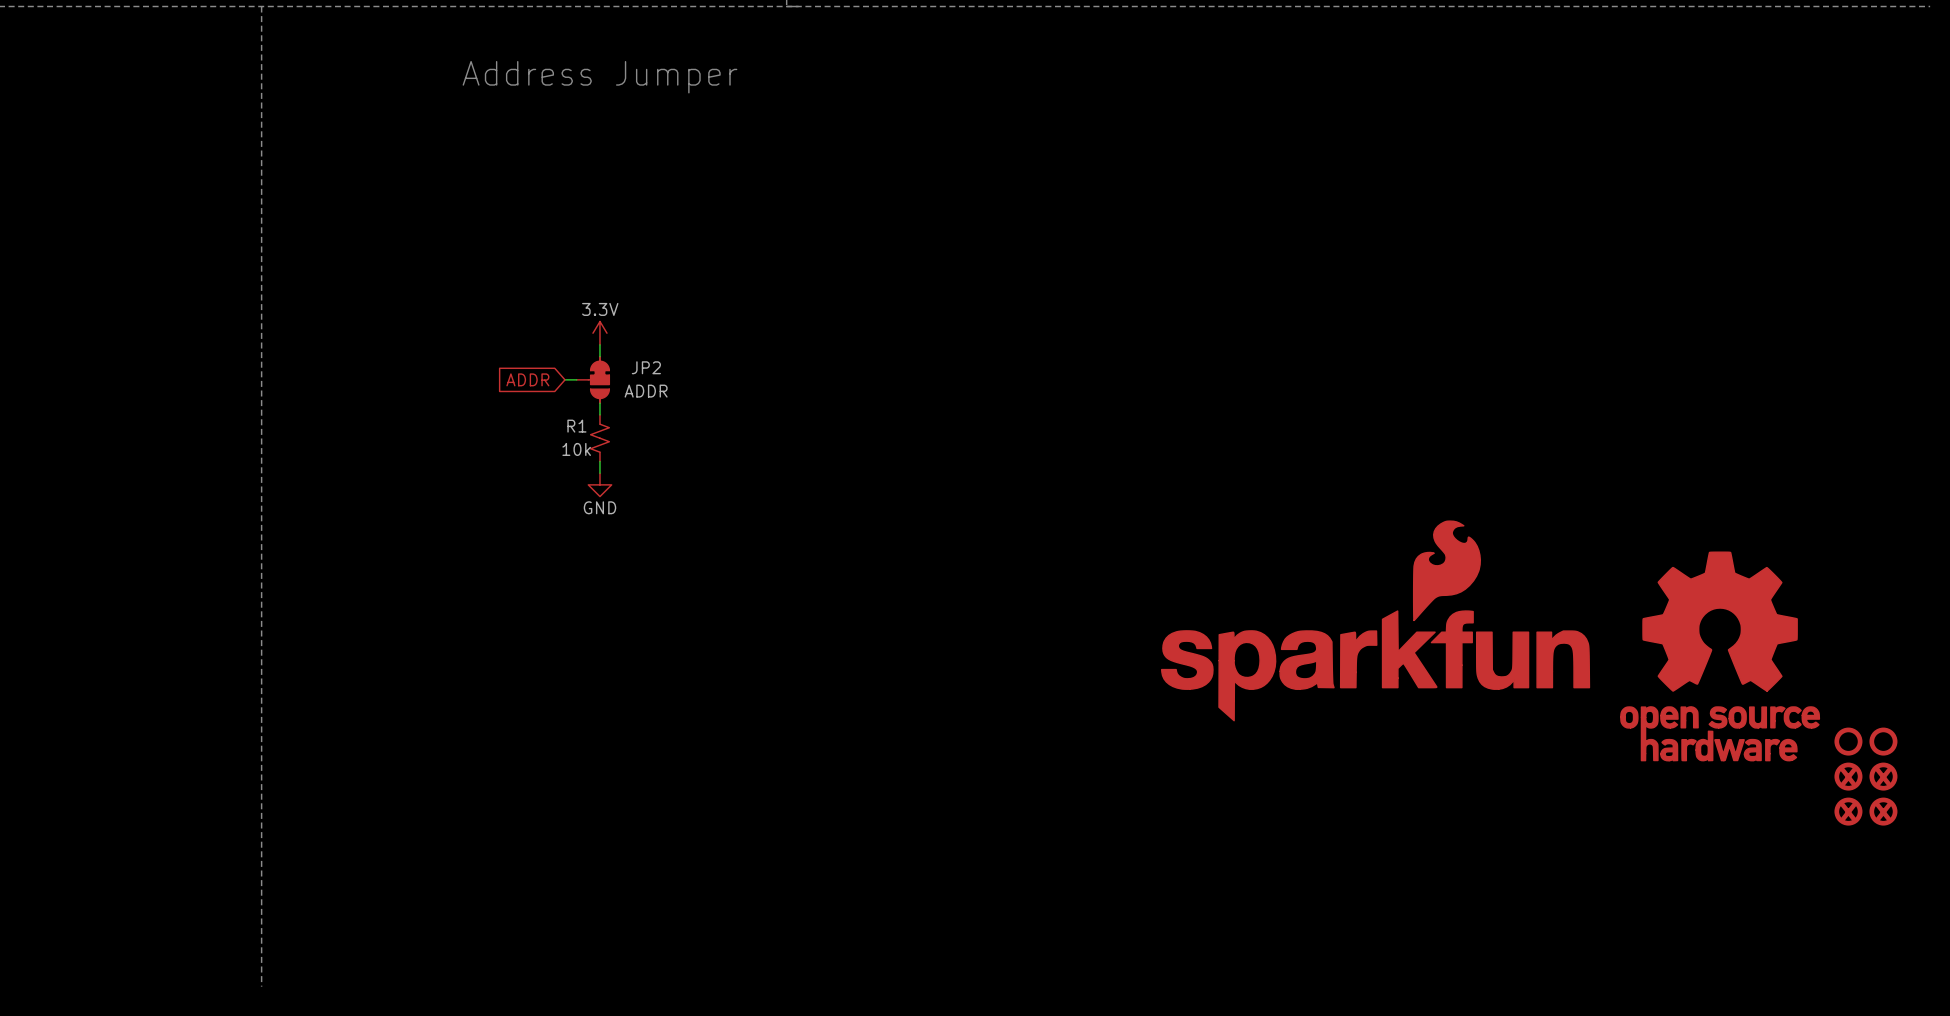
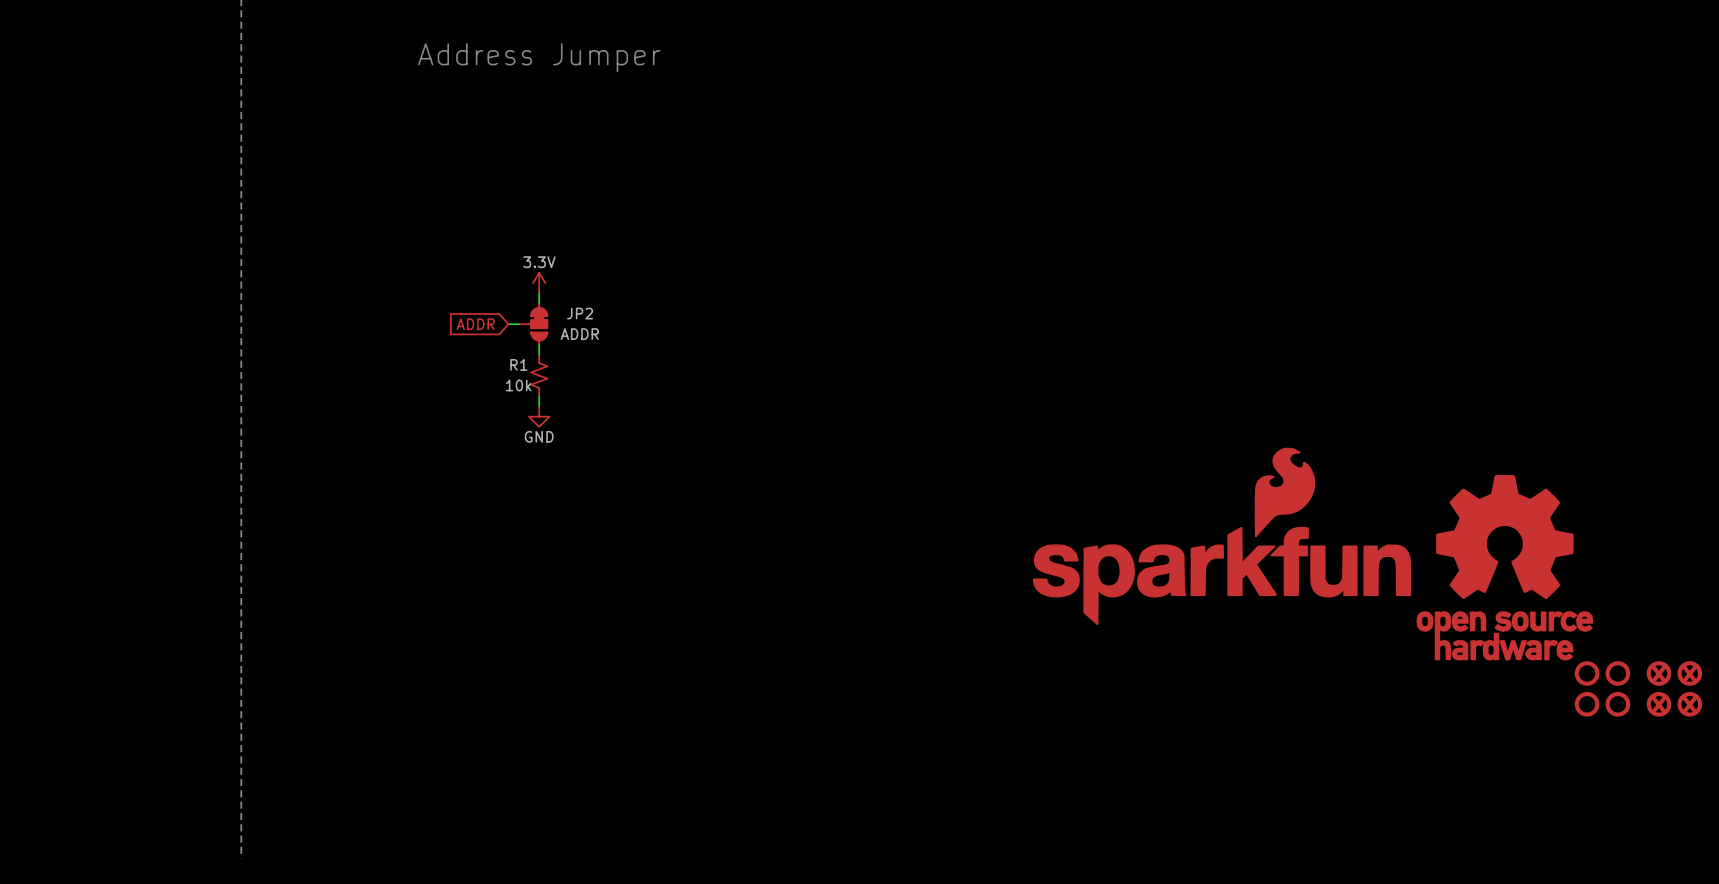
part position: (1720, 656) -> (1504, 567)
part: (1848, 741) -> none
part: (1883, 741) -> none
part: none -> (1587, 673)
part: none -> (1617, 673)
part: (1848, 776) -> none
part: none -> (1658, 673)
part: (1883, 776) -> none
part: none -> (1689, 673)
part: none -> (1587, 704)
part: none -> (1617, 704)
part: (1848, 811) -> none
part: none -> (1658, 704)
part: (1883, 811) -> none
part: none -> (1689, 704)

